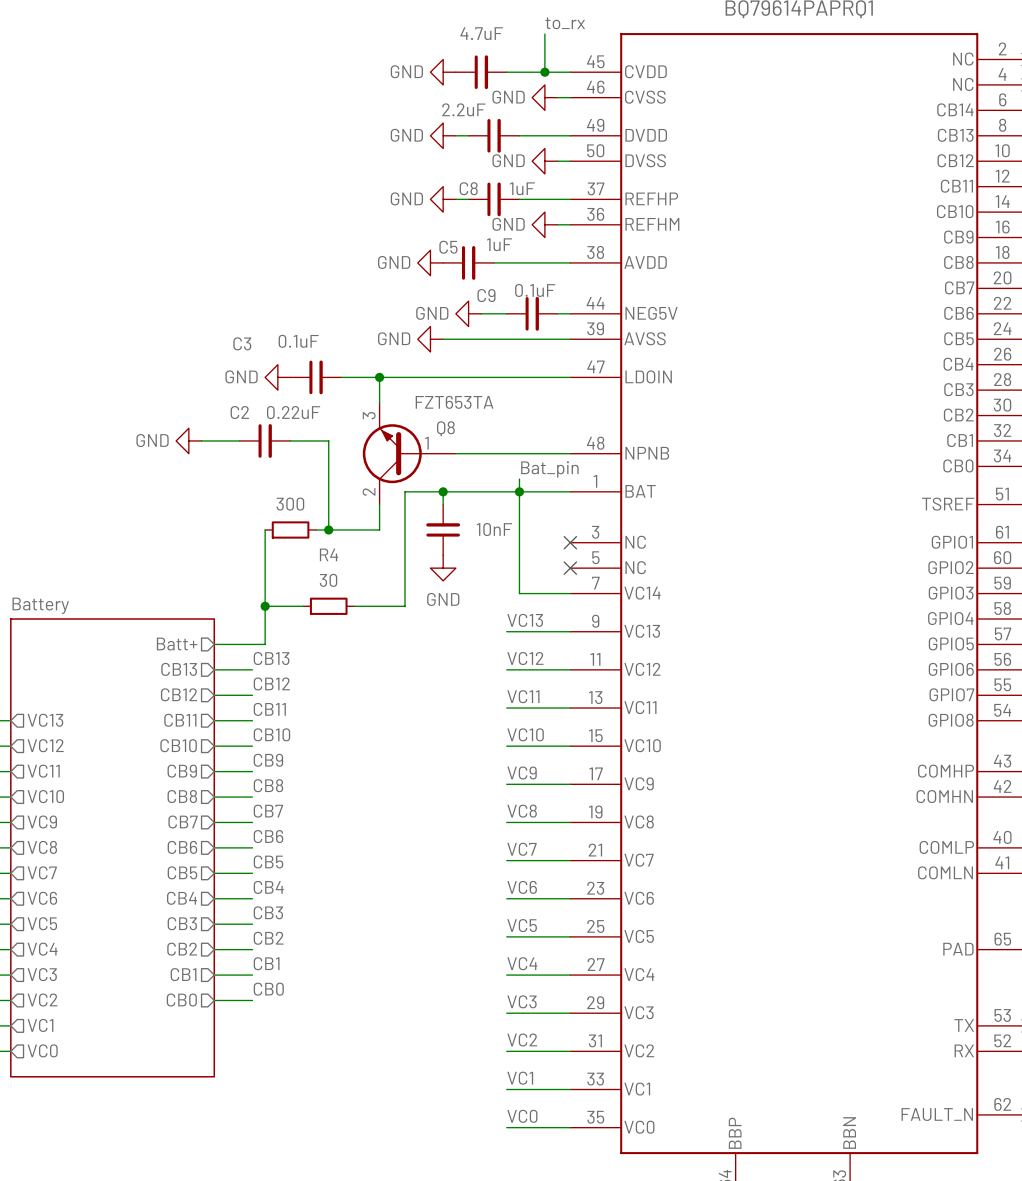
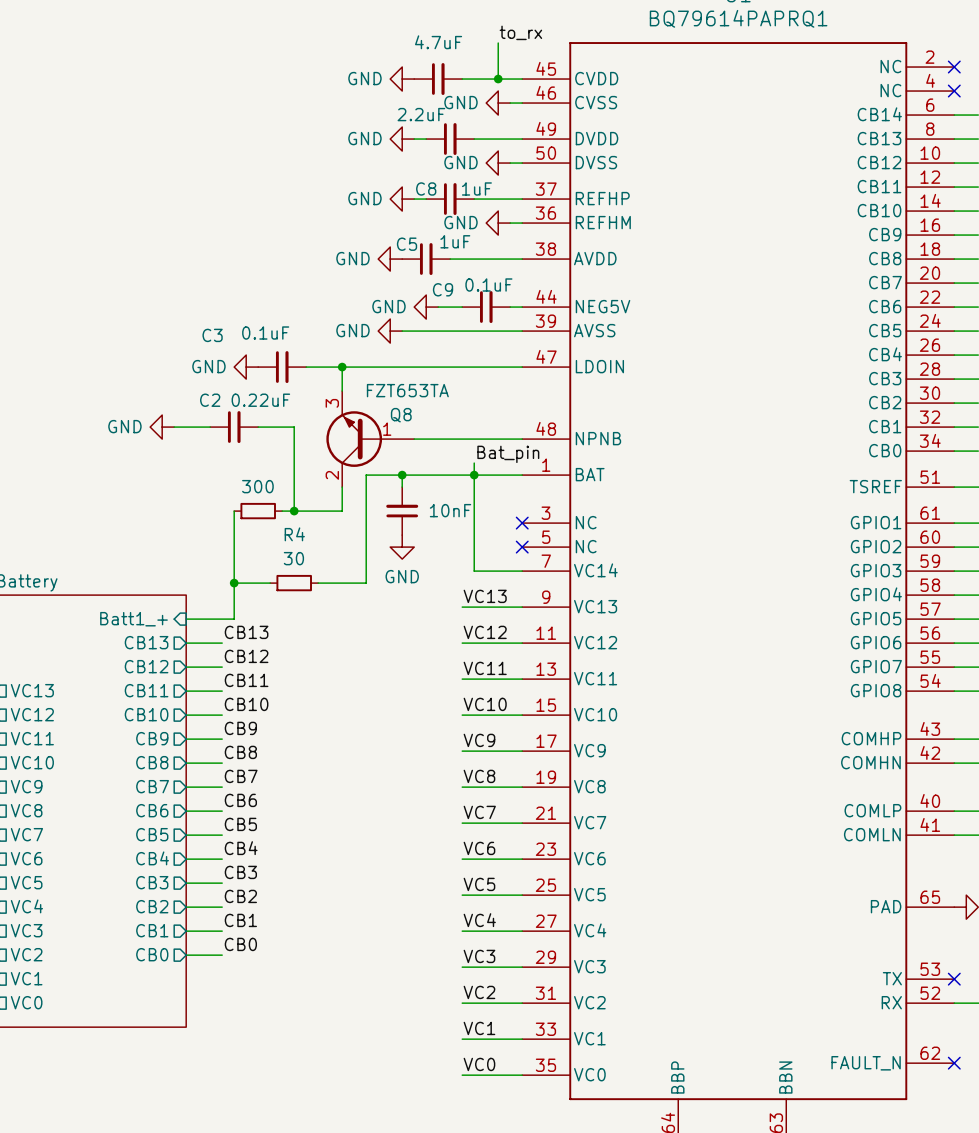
sheet pin shape: output (177, 644) -> input (133, 619)
sheet pin: Batt+ (177, 644) -> Batt1_+ (133, 619)

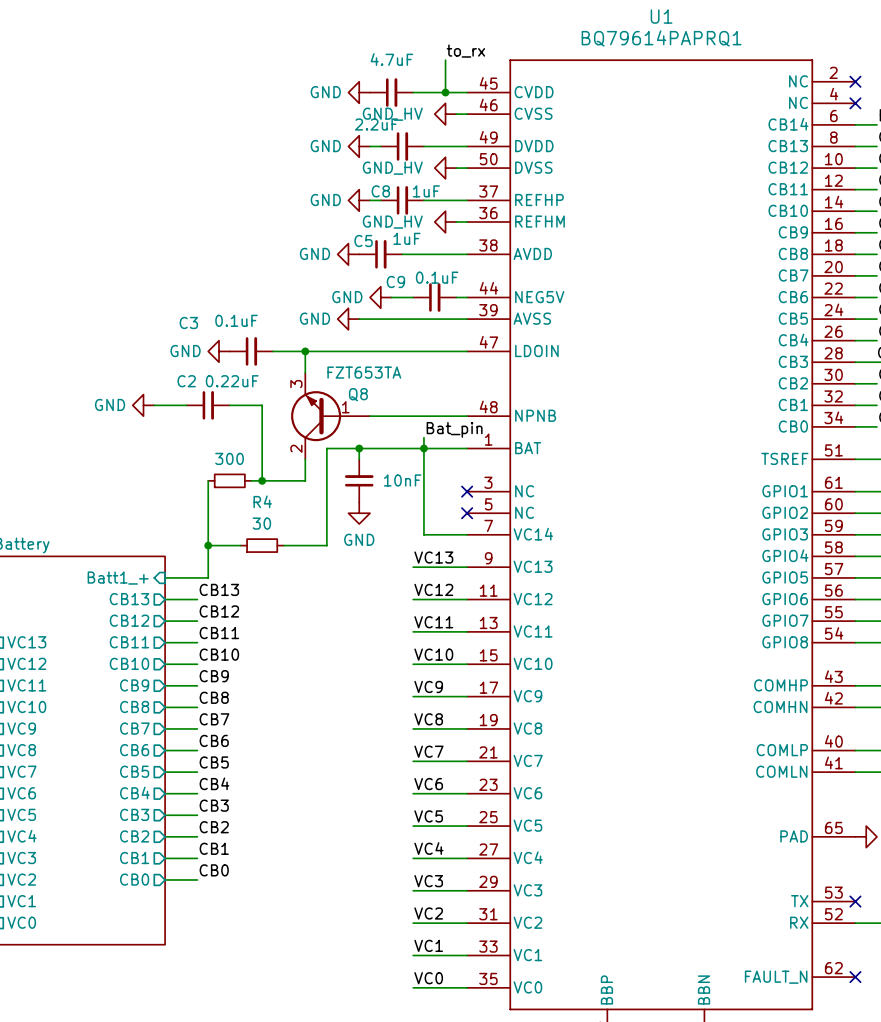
power symbol: GND (498, 103) -> GND_HV (445, 114)
power symbol: GND (498, 163) -> GND_HV (445, 168)
power symbol: GND (498, 223) -> GND_HV (445, 221)

